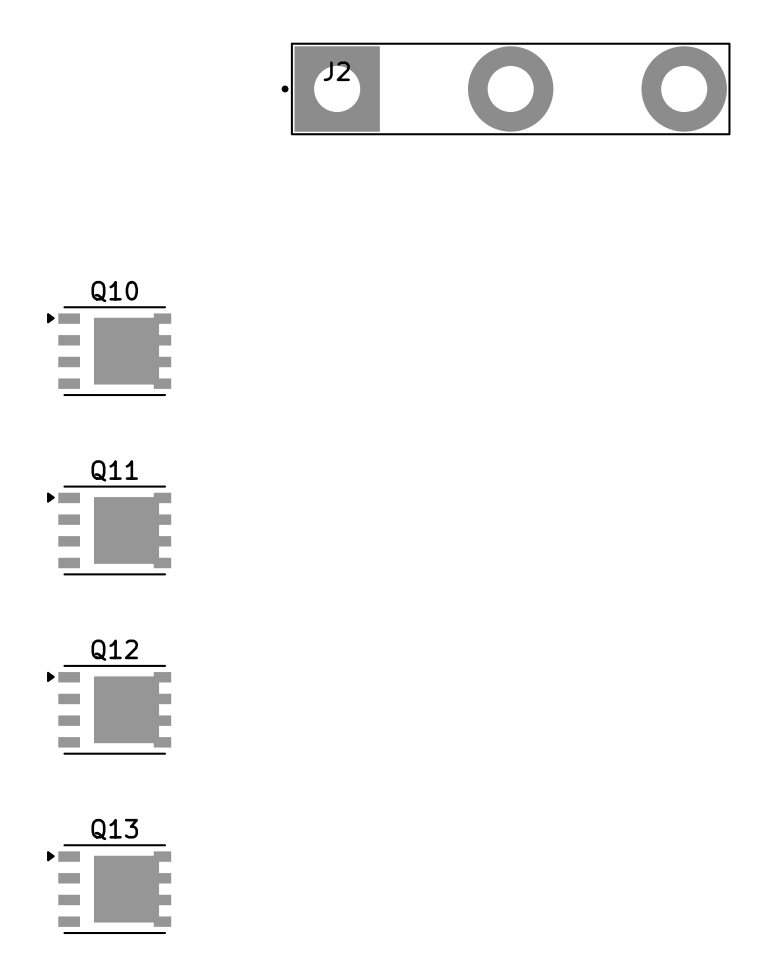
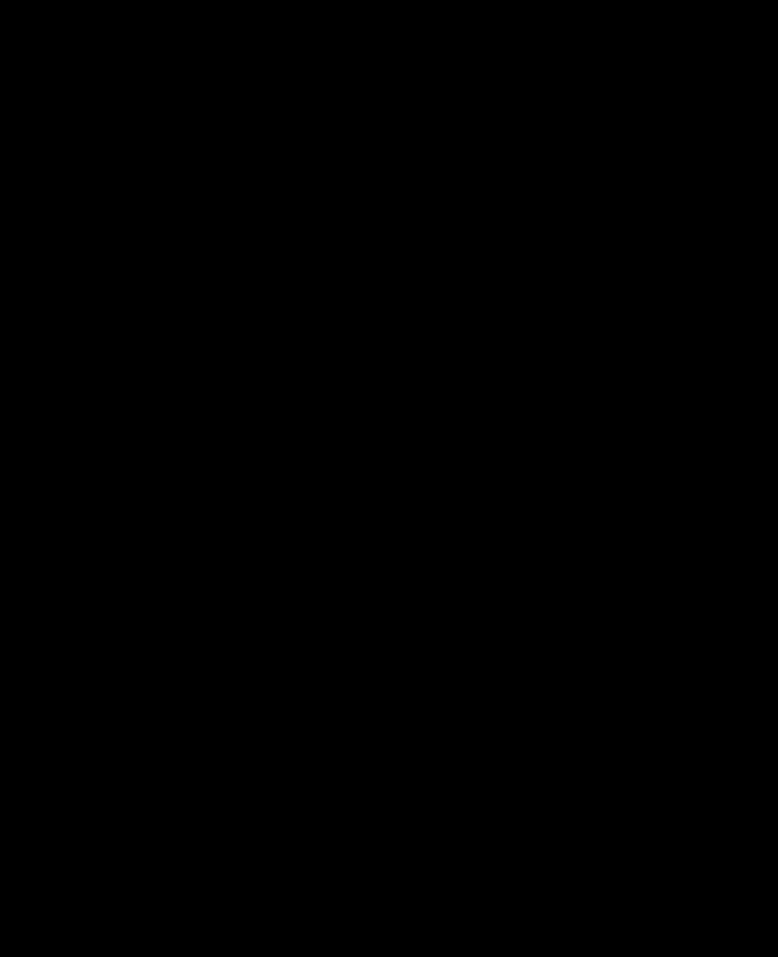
J2: (506, 88) -> none
Q10: (109, 351) -> none
Q11: (109, 530) -> none
Q12: (109, 709) -> none
Q13: (109, 889) -> none

